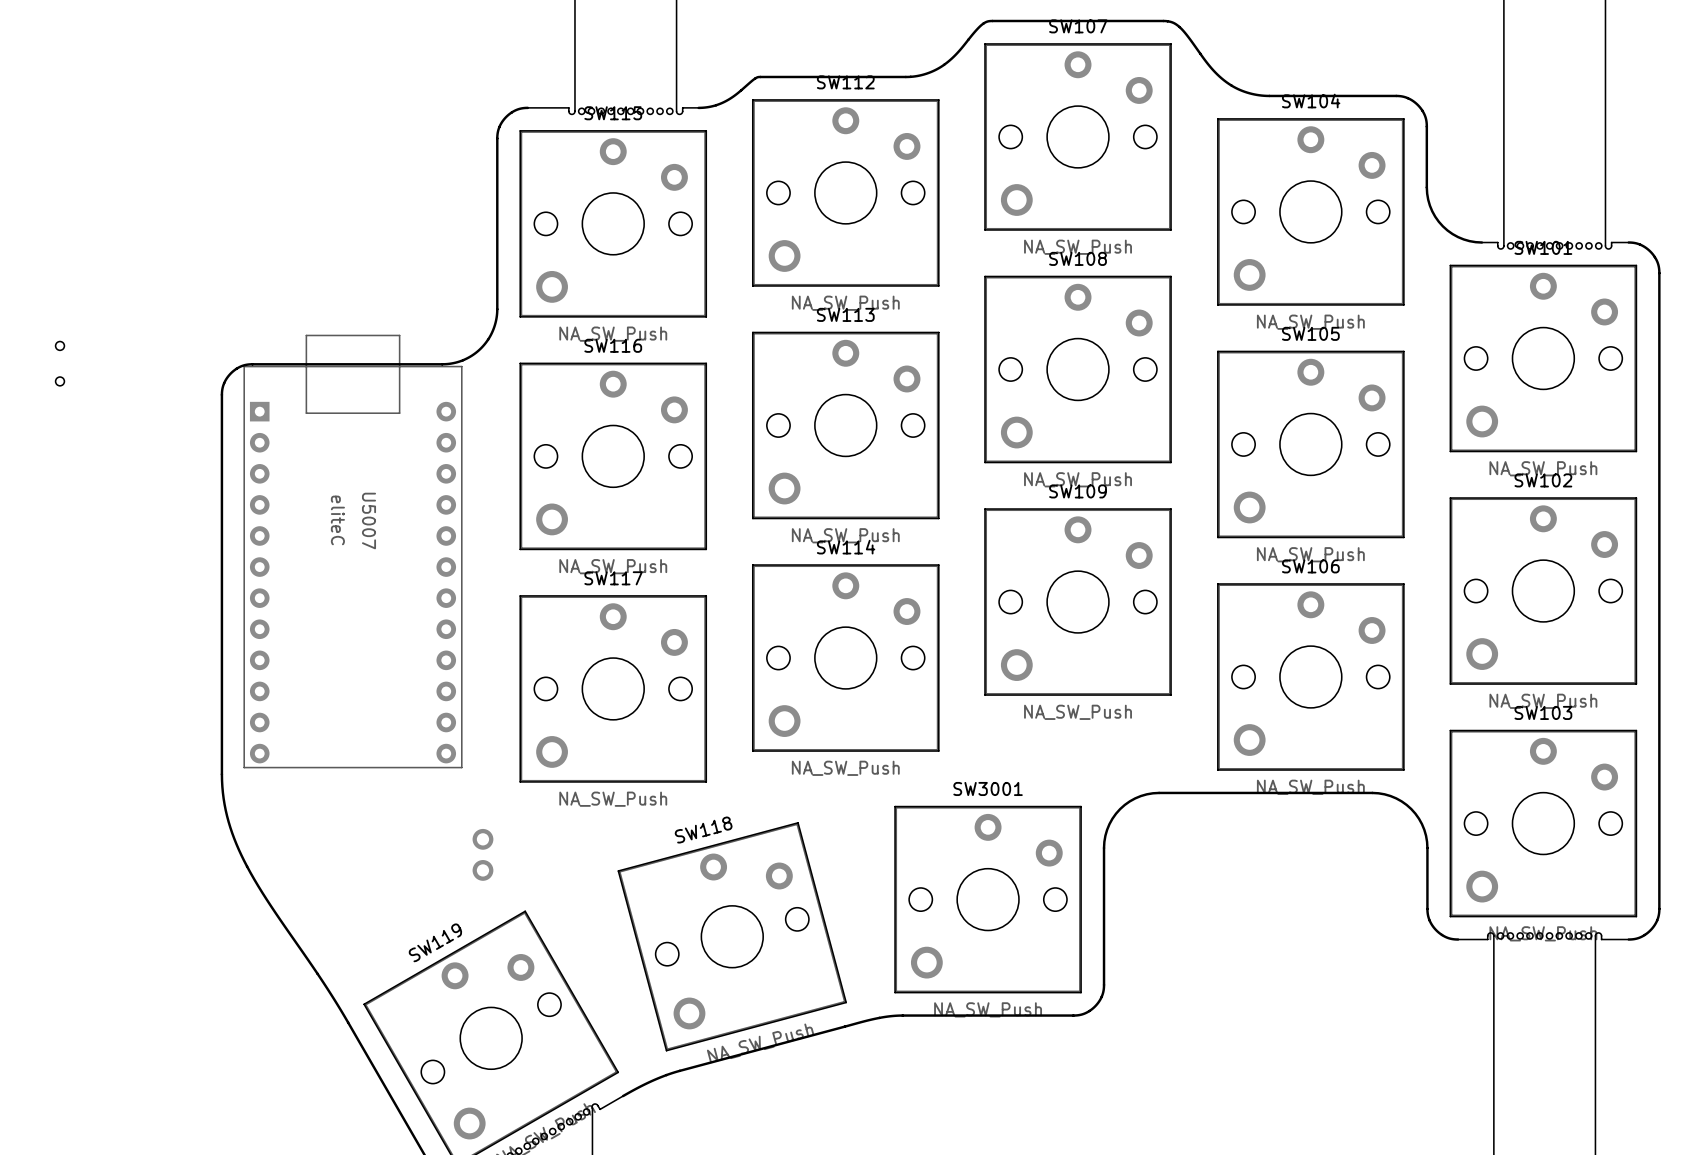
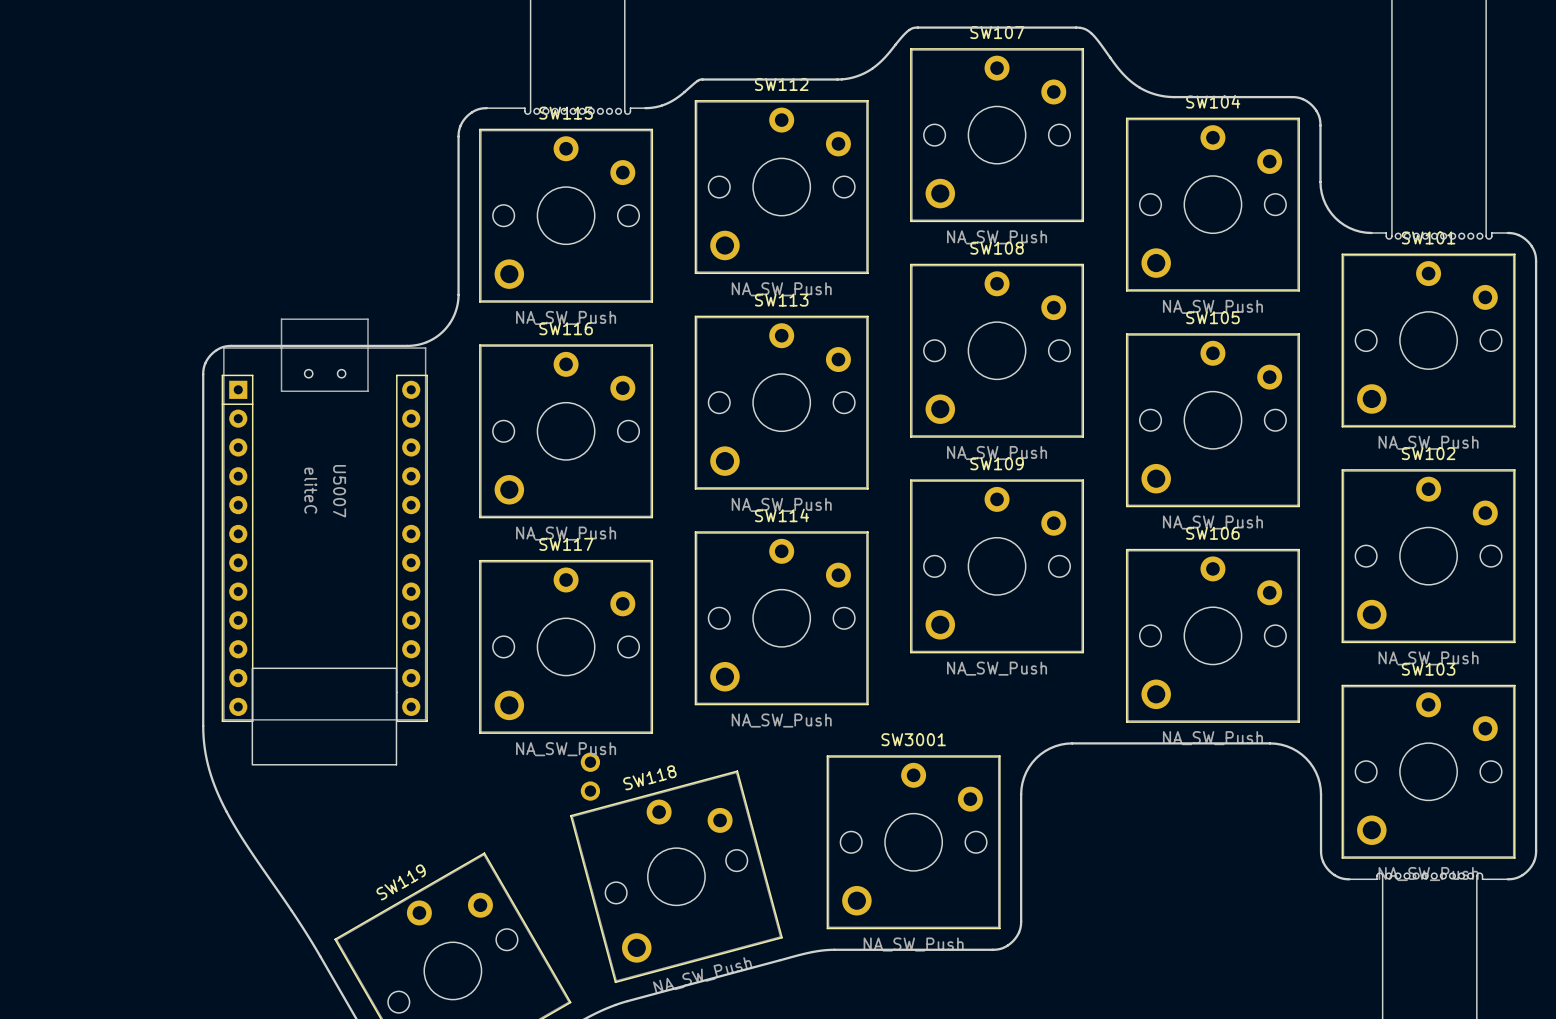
U5007 footprint: [243, 334, 463, 769] -> [221, 318, 428, 766]
part rotation: 0° (60, 363) -> 90° clockwise (325, 373)
part position: (60, 363) -> (325, 373)
part position: (482, 854) -> (590, 776)

